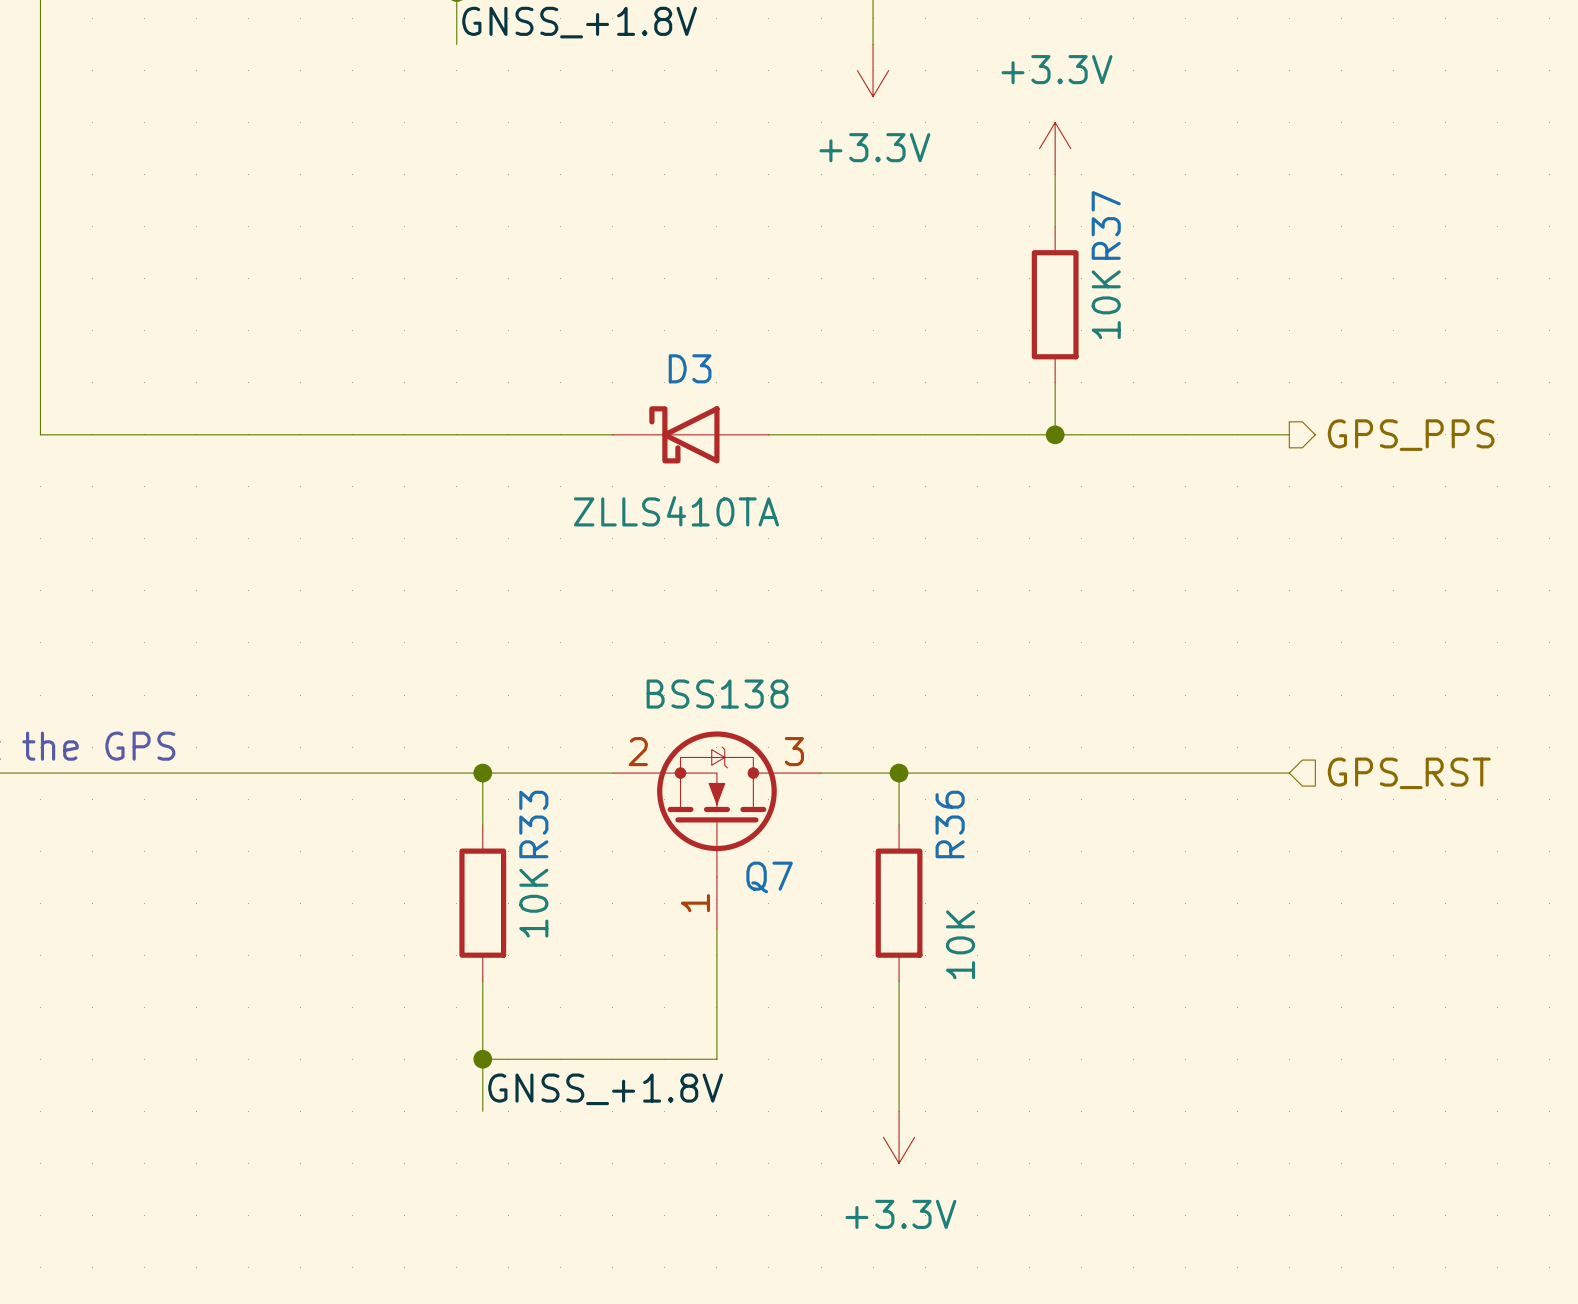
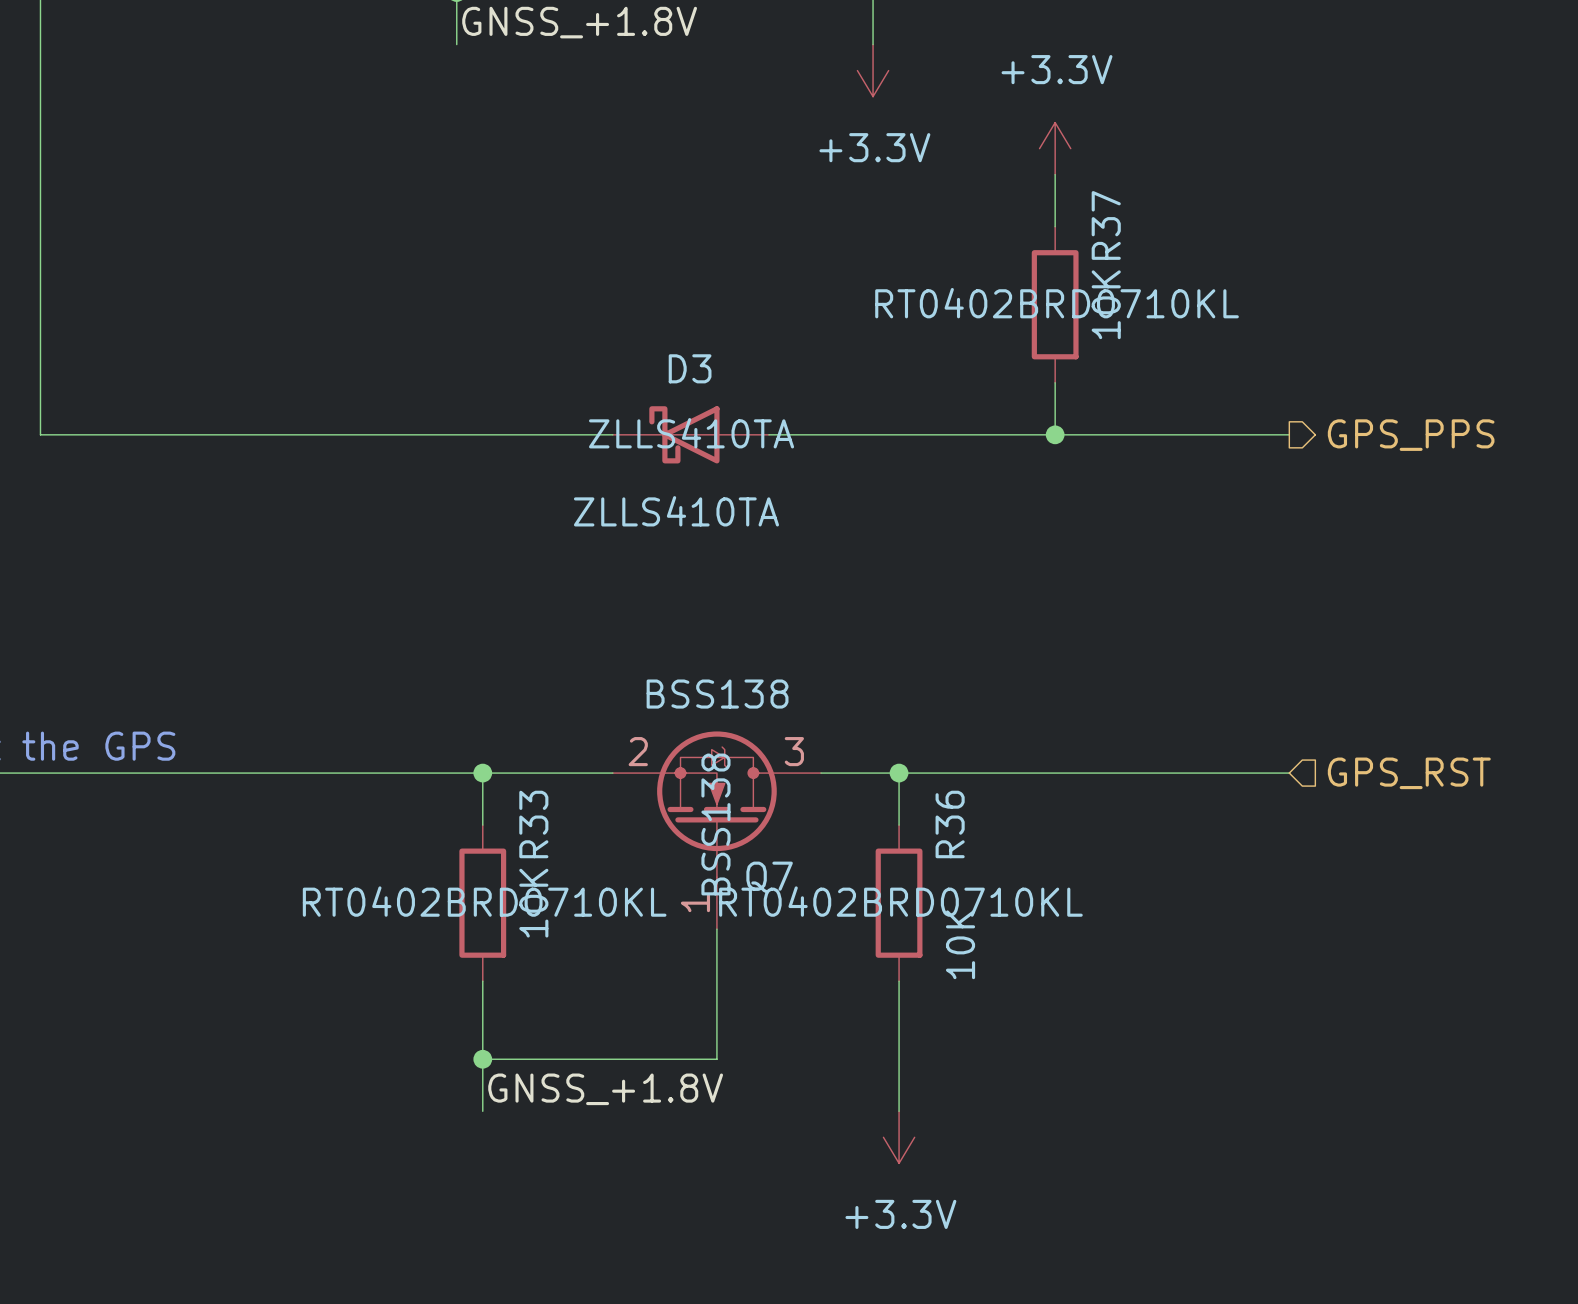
R37 text: none -> RT0402BRD0710KL (1057, 303)
D3 text: none -> ZLLS410TA (691, 433)
Q7 text: none -> BSS138 (715, 824)
R33 text: none -> RT0402BRD0710KL (484, 901)
R36 text: none -> RT0402BRD0710KL (900, 901)

